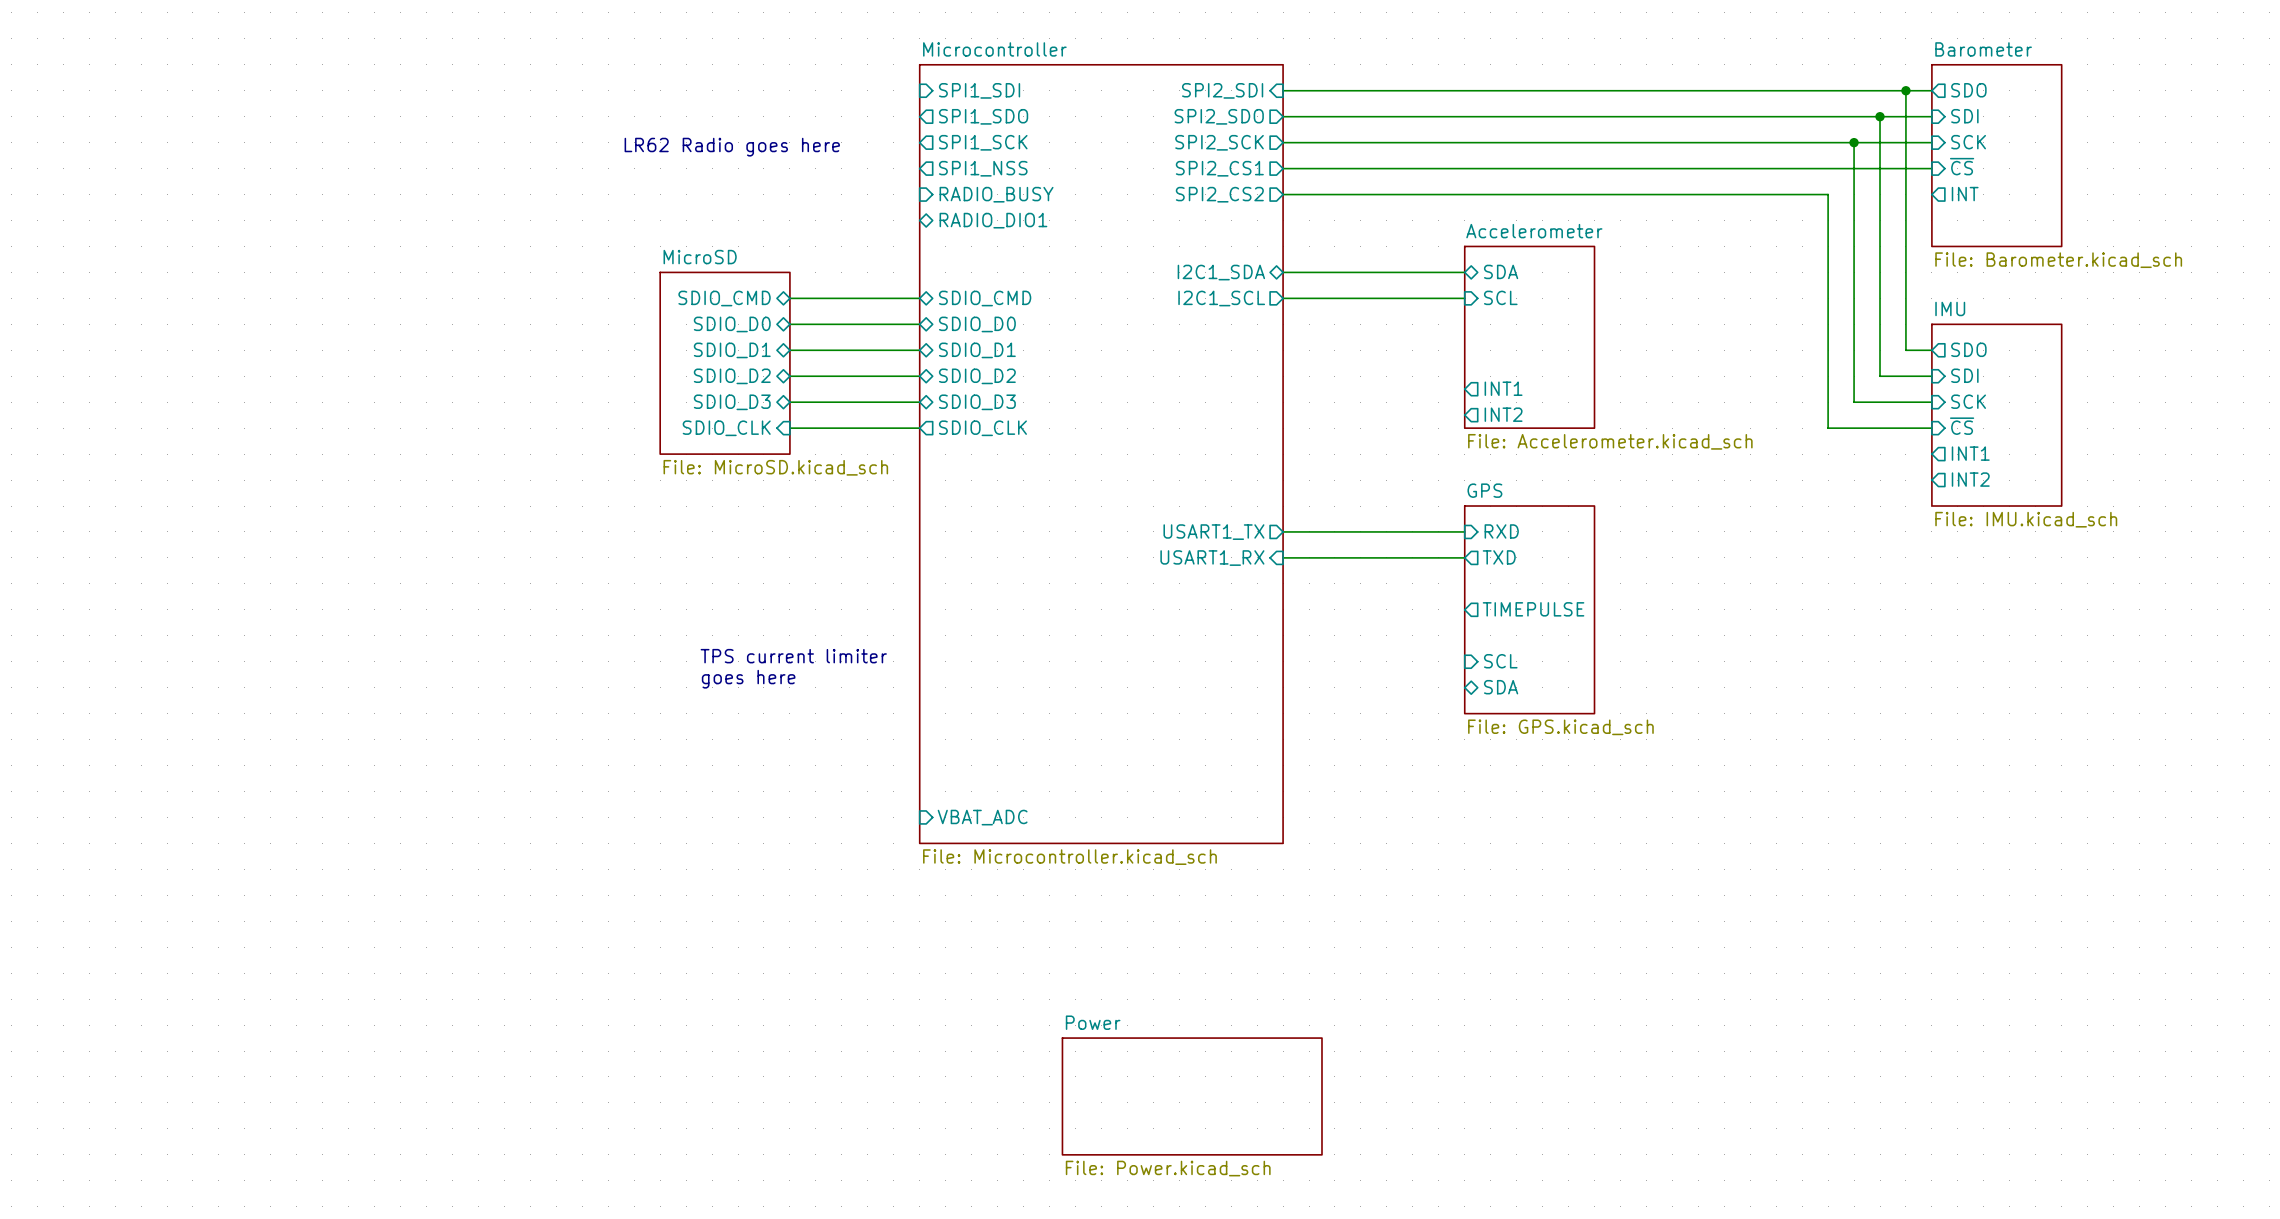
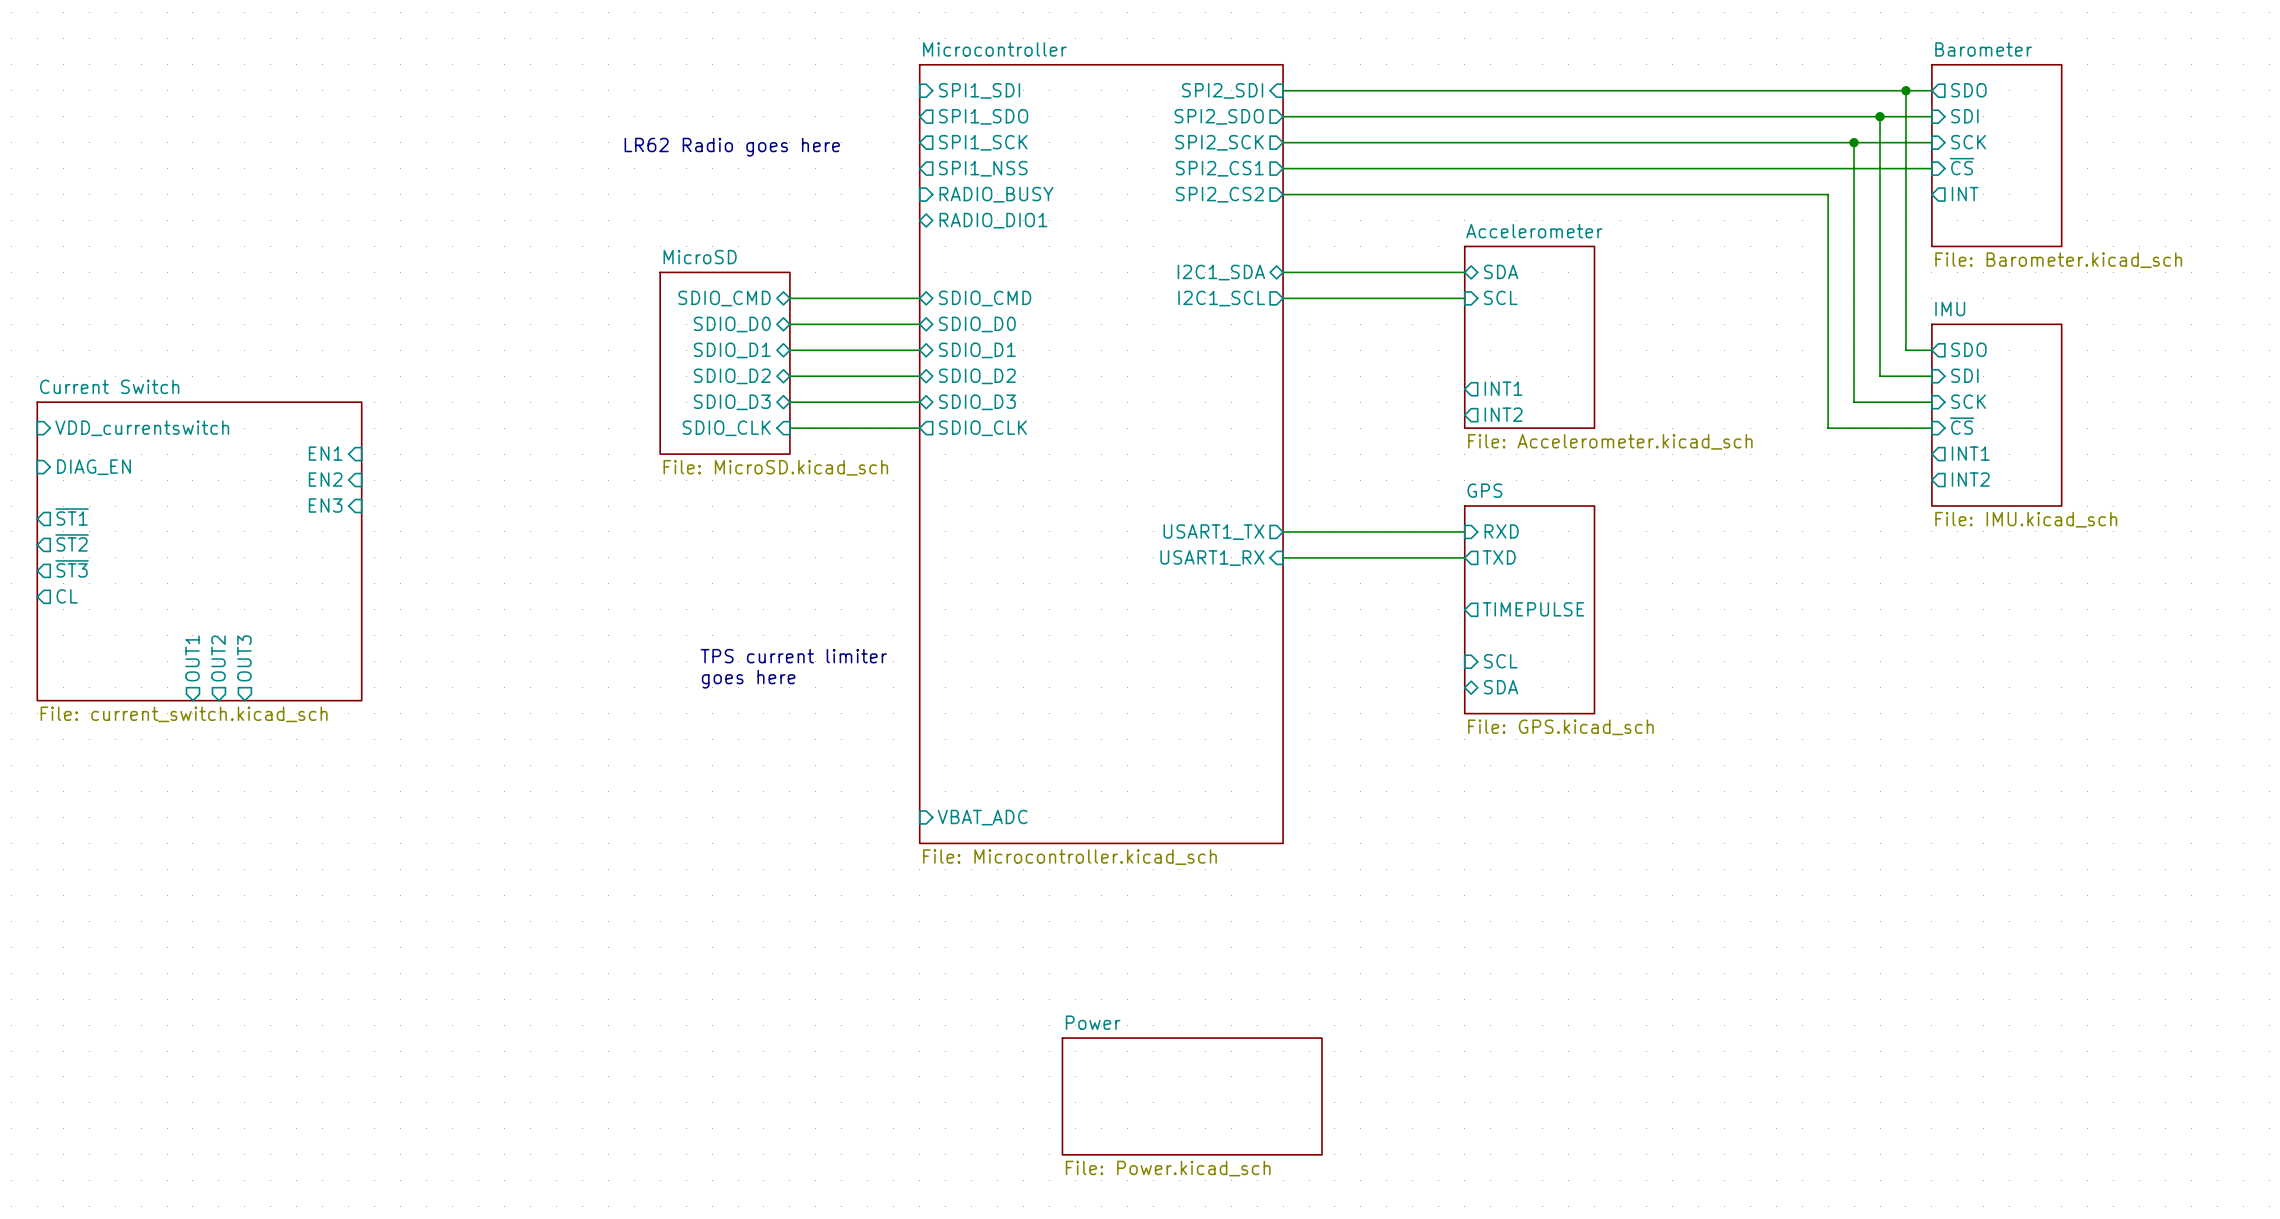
sheet pin: none -> VDD_currentswitch (142, 428)
sheet pin: none -> EN1 (325, 453)
sheet pin: none -> DIAG_EN (94, 467)
sheet pin: none -> EN2 (325, 479)
sheet pin: none -> EN3 (325, 505)
sheet pin: none -> ~{ST1} (72, 517)
sheet pin: none -> ~{ST2} (72, 542)
sheet Current Switch: none -> File: current_switch.kicad_sch (199, 551)
sheet pin: none -> ~{ST3} (72, 568)
sheet pin: none -> CL (67, 596)
sheet pin: none -> OUT1 (192, 658)
sheet pin: none -> OUT2 (218, 658)
sheet pin: none -> OUT3 (244, 658)

